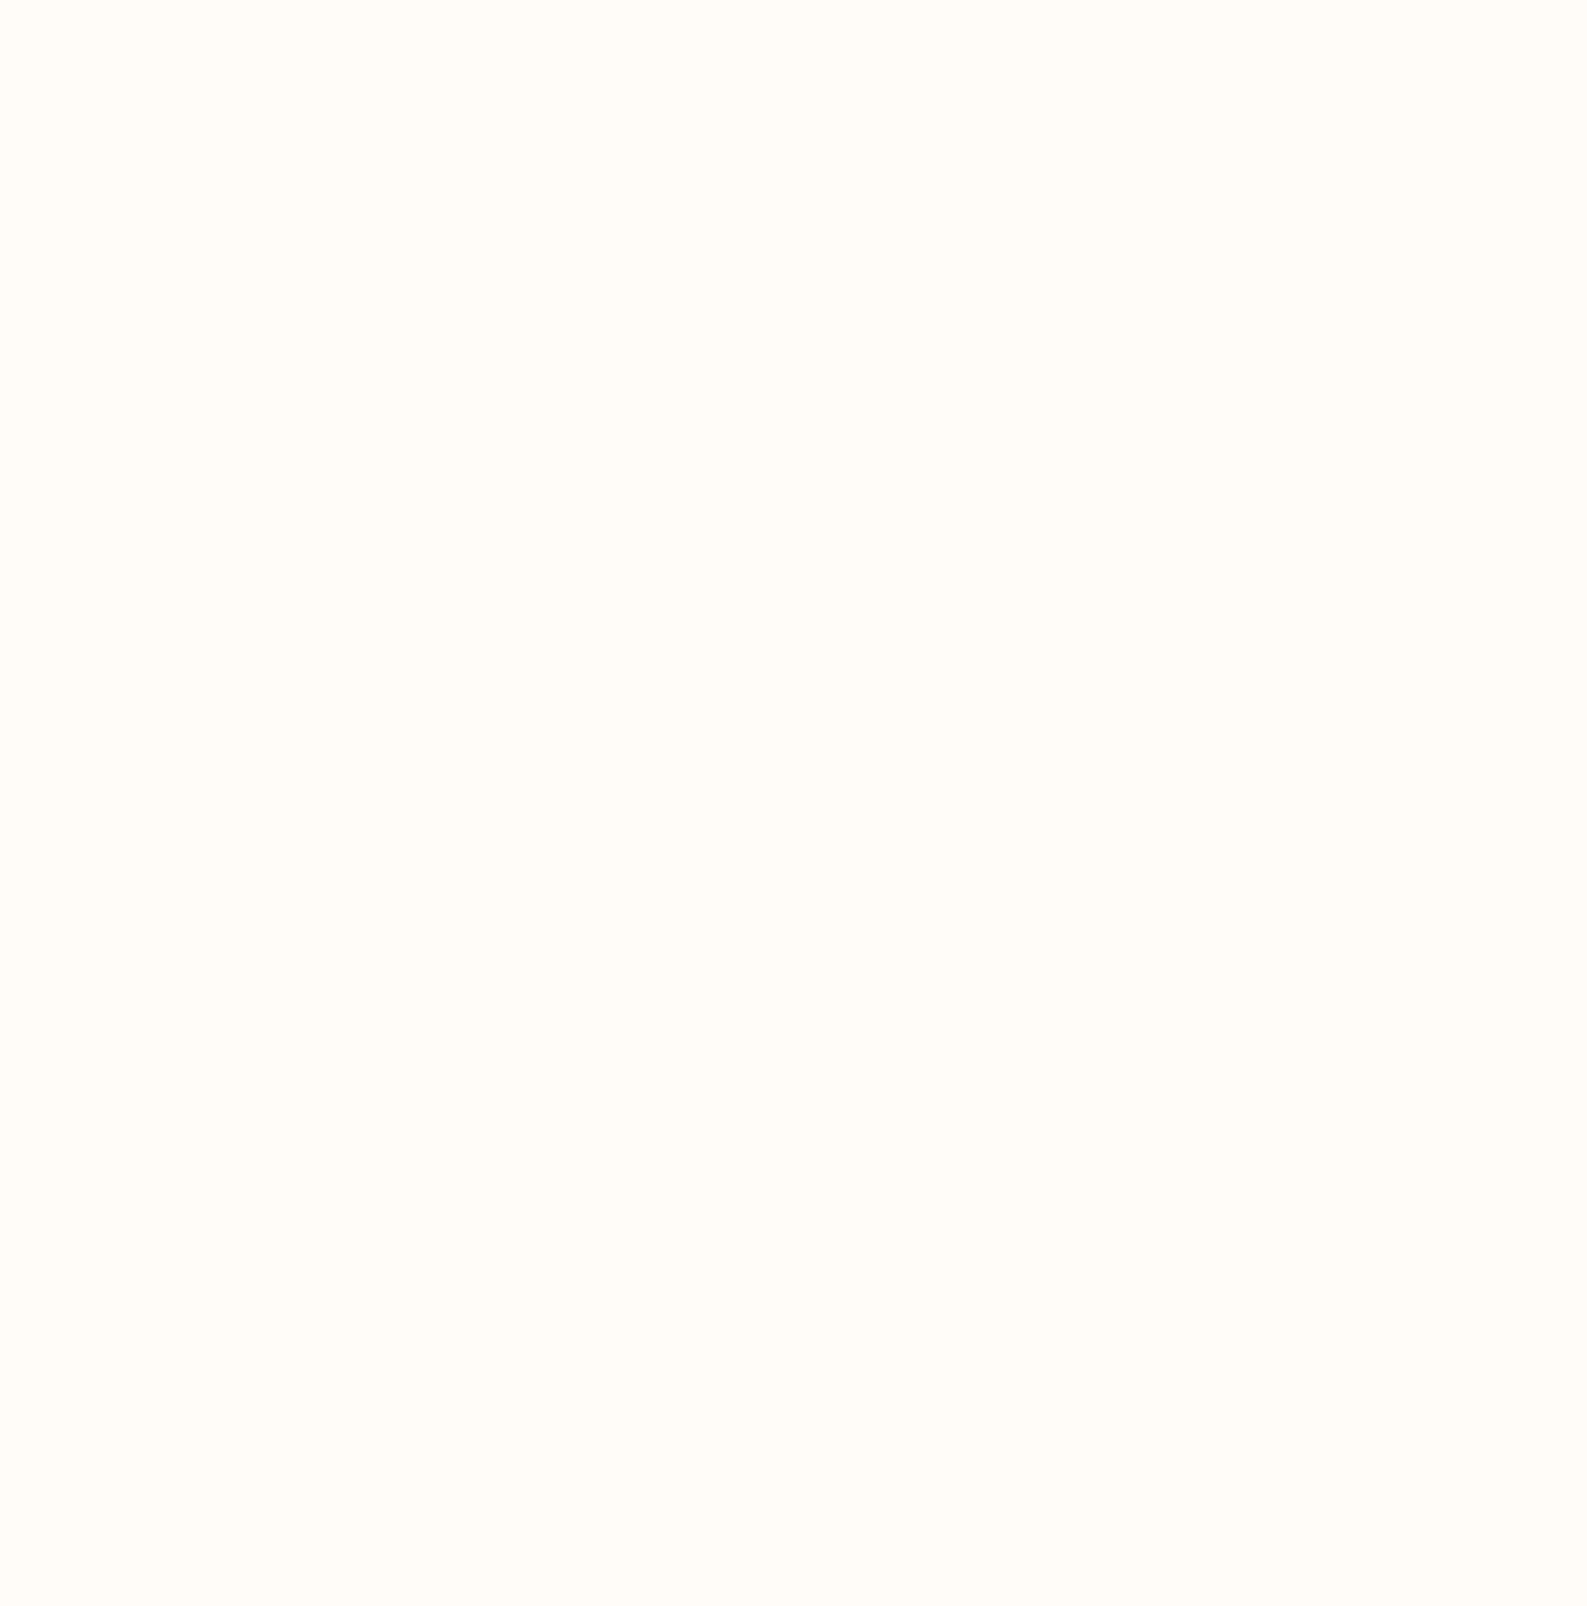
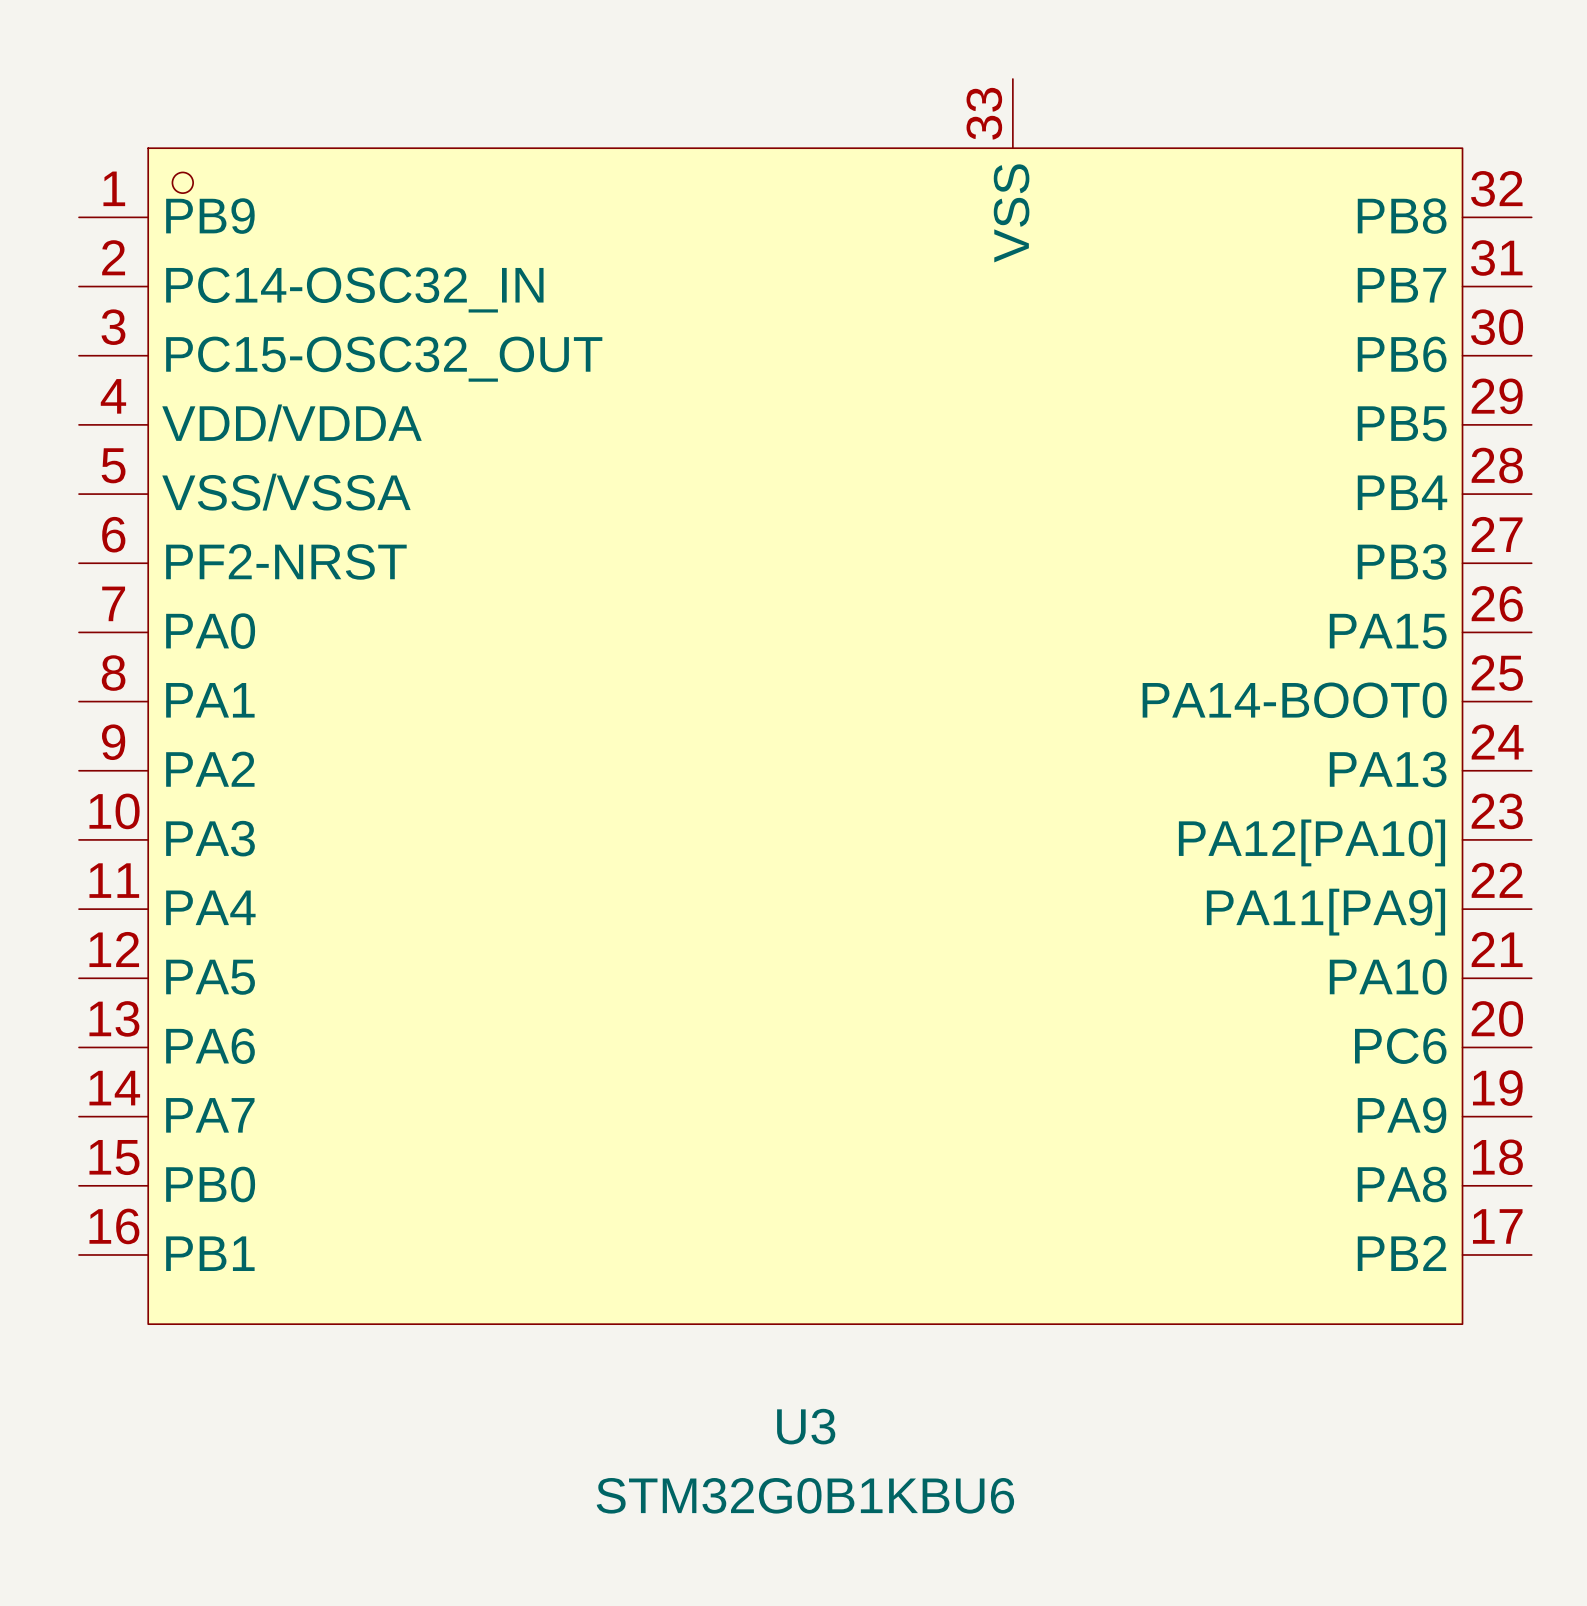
U3: none -> STM32G0B1KBU6 (805, 701)

